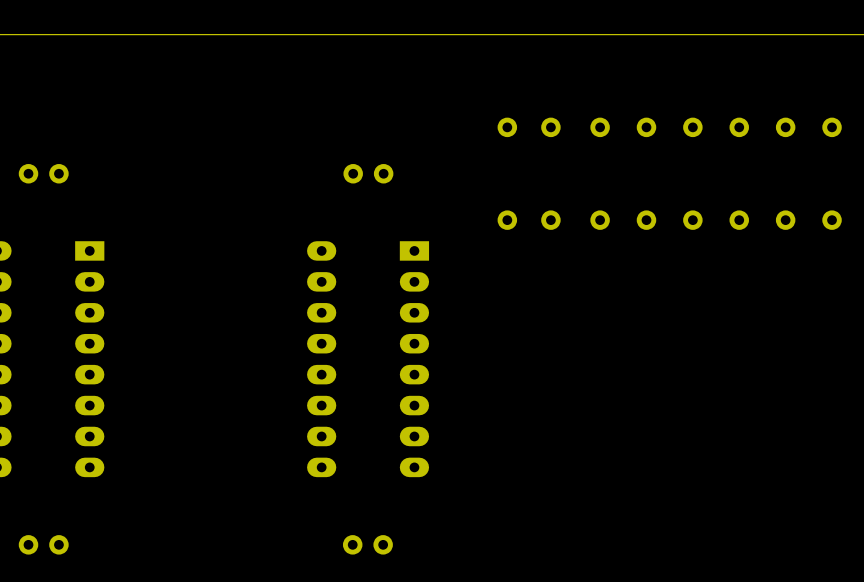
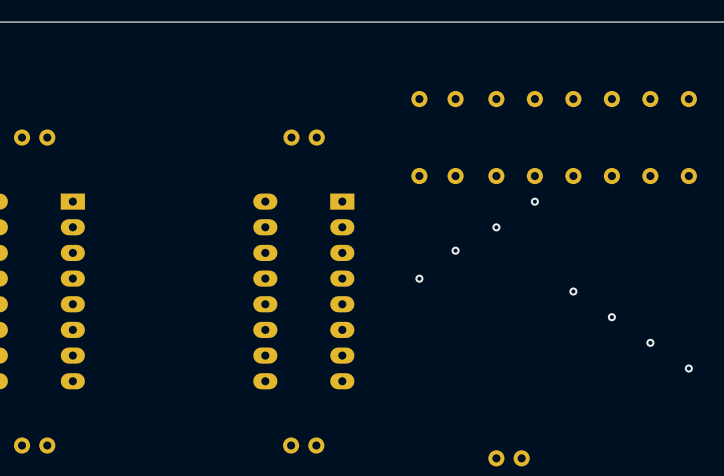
via: none -> (534, 201)
via: none -> (496, 227)
via: none -> (455, 250)
via: none -> (419, 278)
via: none -> (573, 291)
via: none -> (611, 317)
via: none -> (650, 342)
via: none -> (688, 368)
part: none -> (509, 458)

